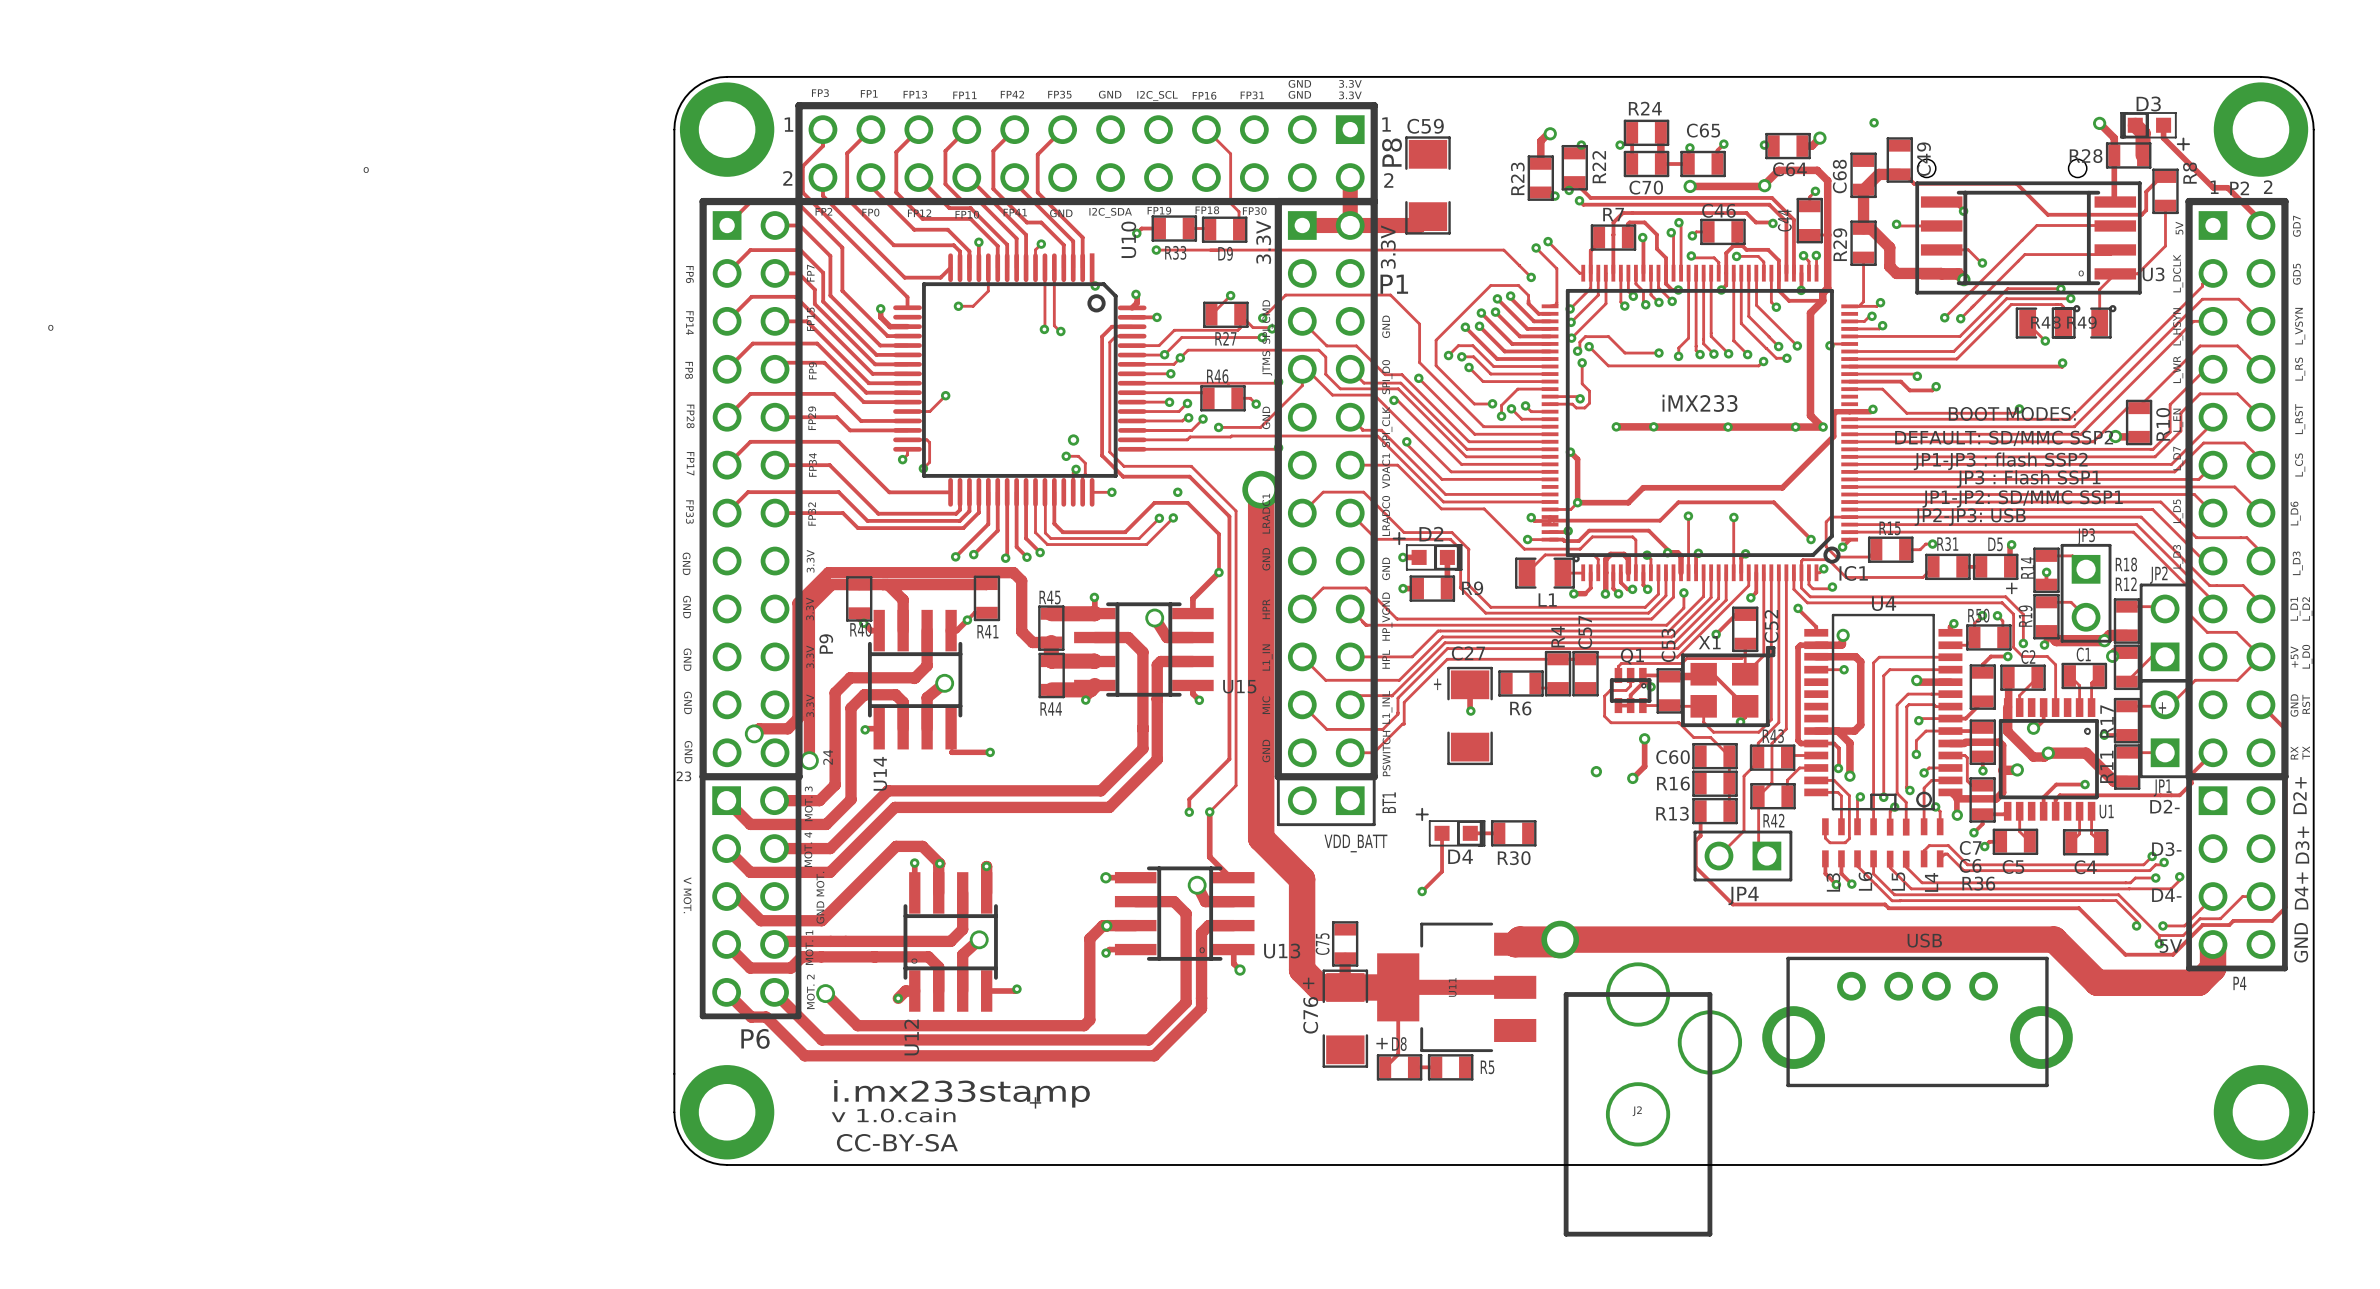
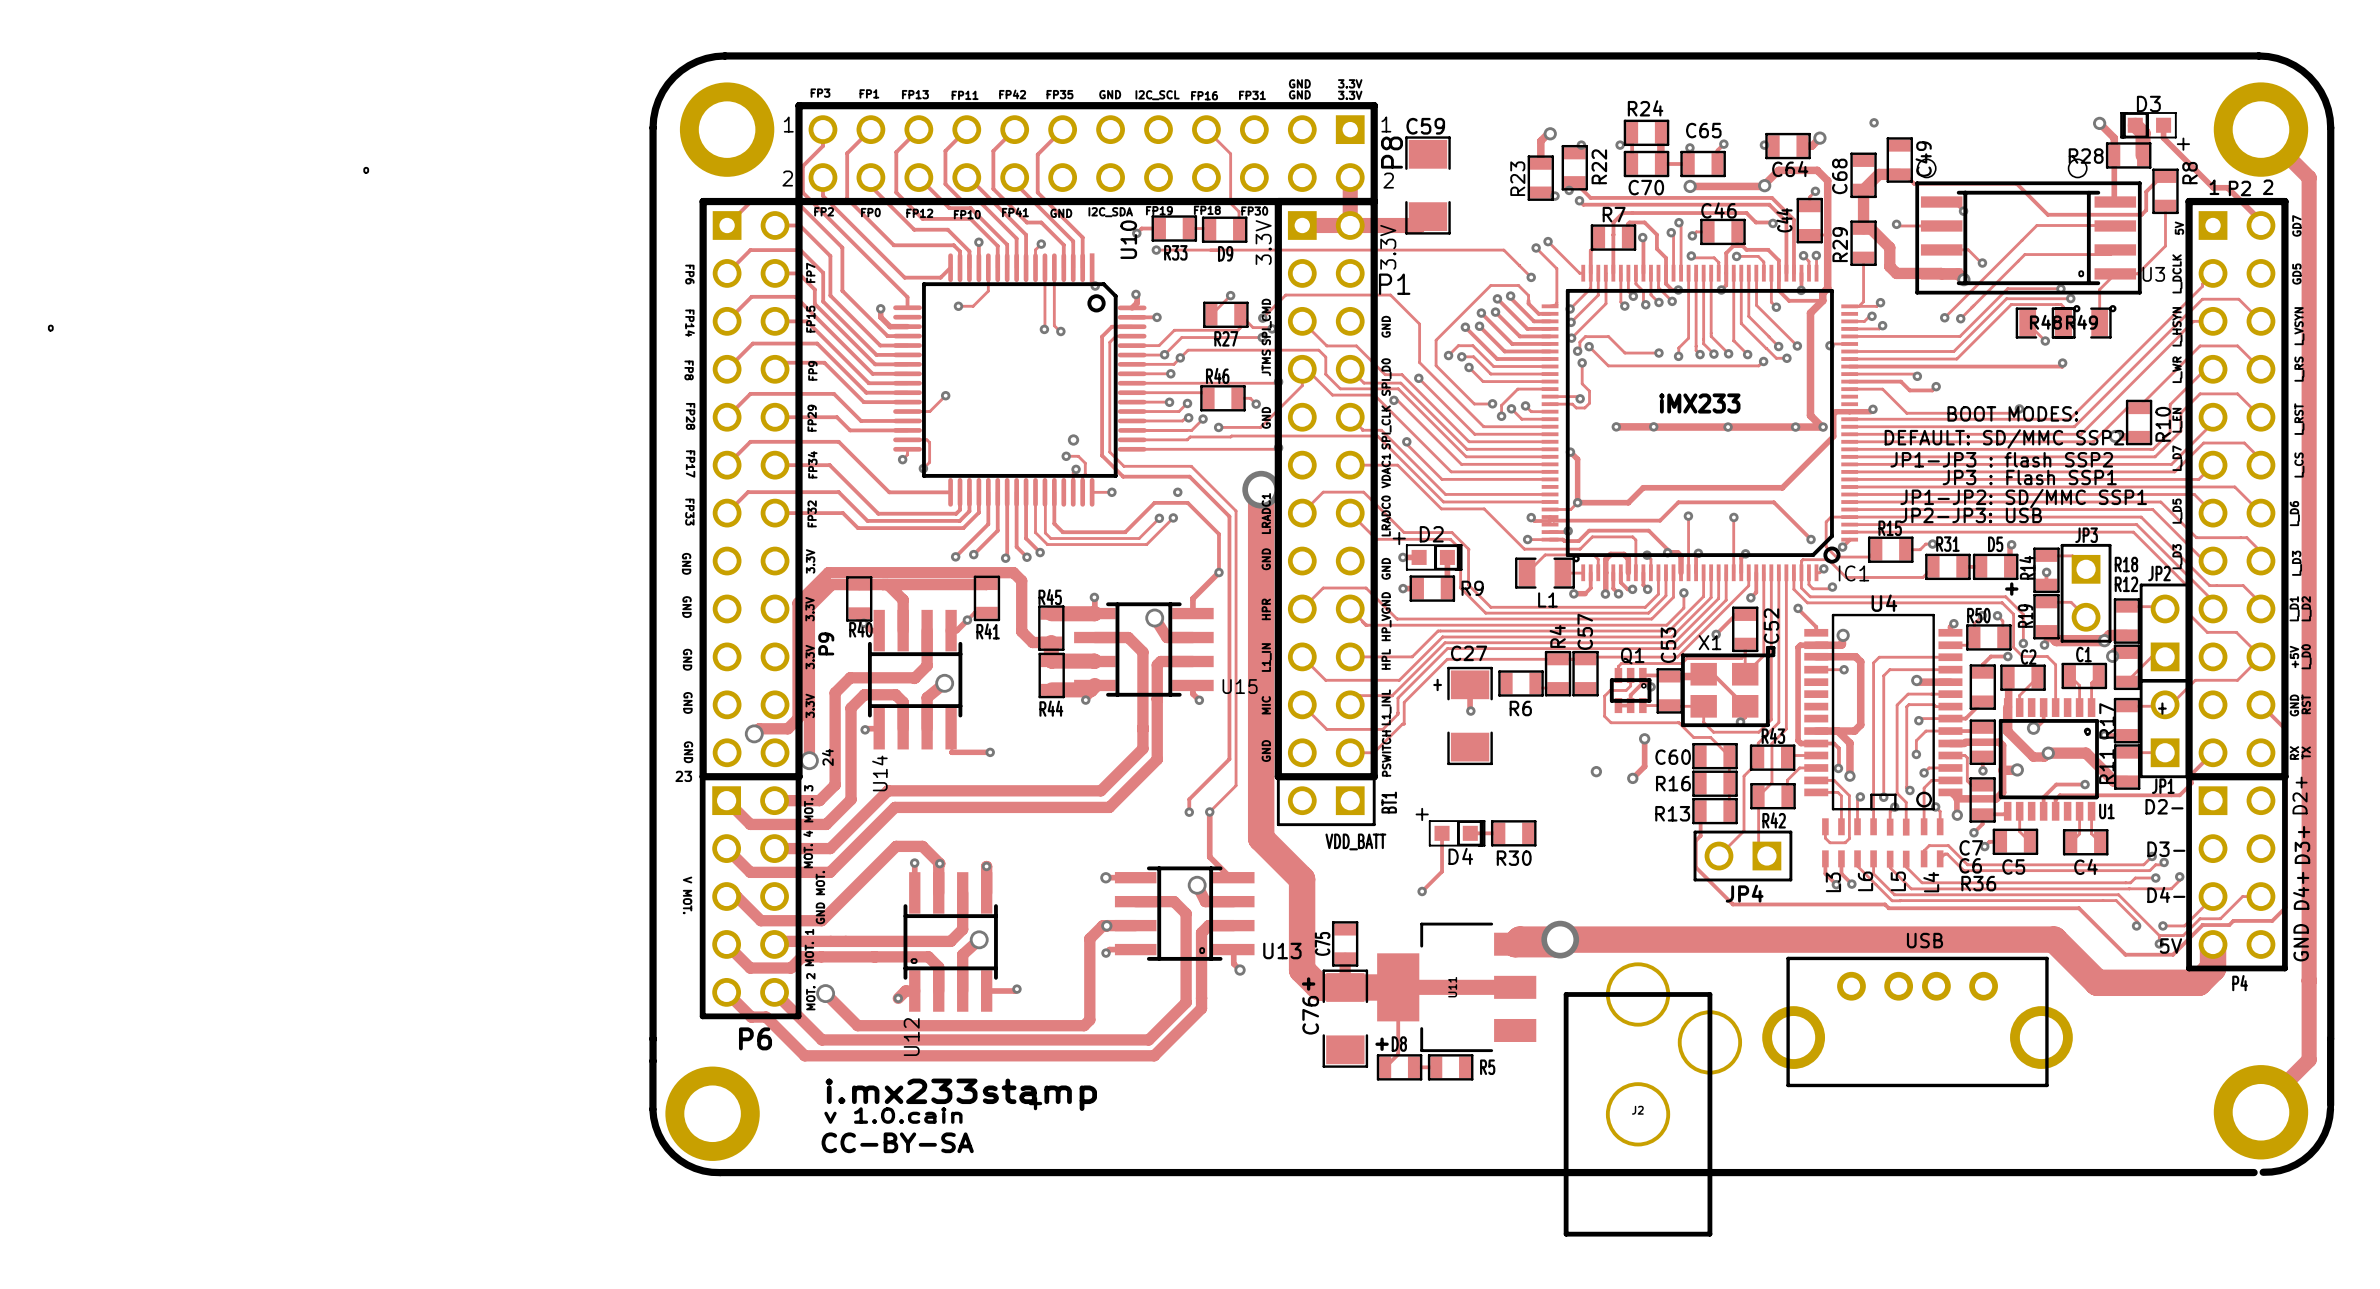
board edge: (727, 76) (2260, 76) (2281, 80) (2293, 87) (2306, 103) (2311, 115) (2313, 129) (2313, 1112) (2309, 1132) (2302, 1144) (2293, 1154) (2281, 1160) (2260, 1164) (727, 1164) (706, 1160) (695, 1154) (681, 1138) (676, 1125) (674, 1112) (674, 129) (678, 109) (689, 92) (706, 80) (727, 76) -> none
track: none -> (2260, 129) (2309, 177) (2309, 1059) (2257, 1111)
board edge: none -> (653, 1038) (653, 118) (658, 100) (674, 77) (697, 61) (724, 55) (2258, 55) (2277, 58) (2294, 65) (2309, 77) (2321, 91) (2328, 109) (2330, 127) (2330, 1038)
board edge: none -> (653, 1038) (653, 1061)
board edge: none -> (2330, 1039) (2330, 1105)
board edge: none -> (652, 1061) (652, 1109)
board edge: none -> (652, 1109) (658, 1134) (673, 1154) (695, 1168) (720, 1172)
board edge: none -> (2330, 1109) (2324, 1133) (2309, 1154) (2288, 1168) (2263, 1172)
part position: (727, 1112) -> (712, 1113)
board edge: none -> (720, 1172) (2254, 1172)

